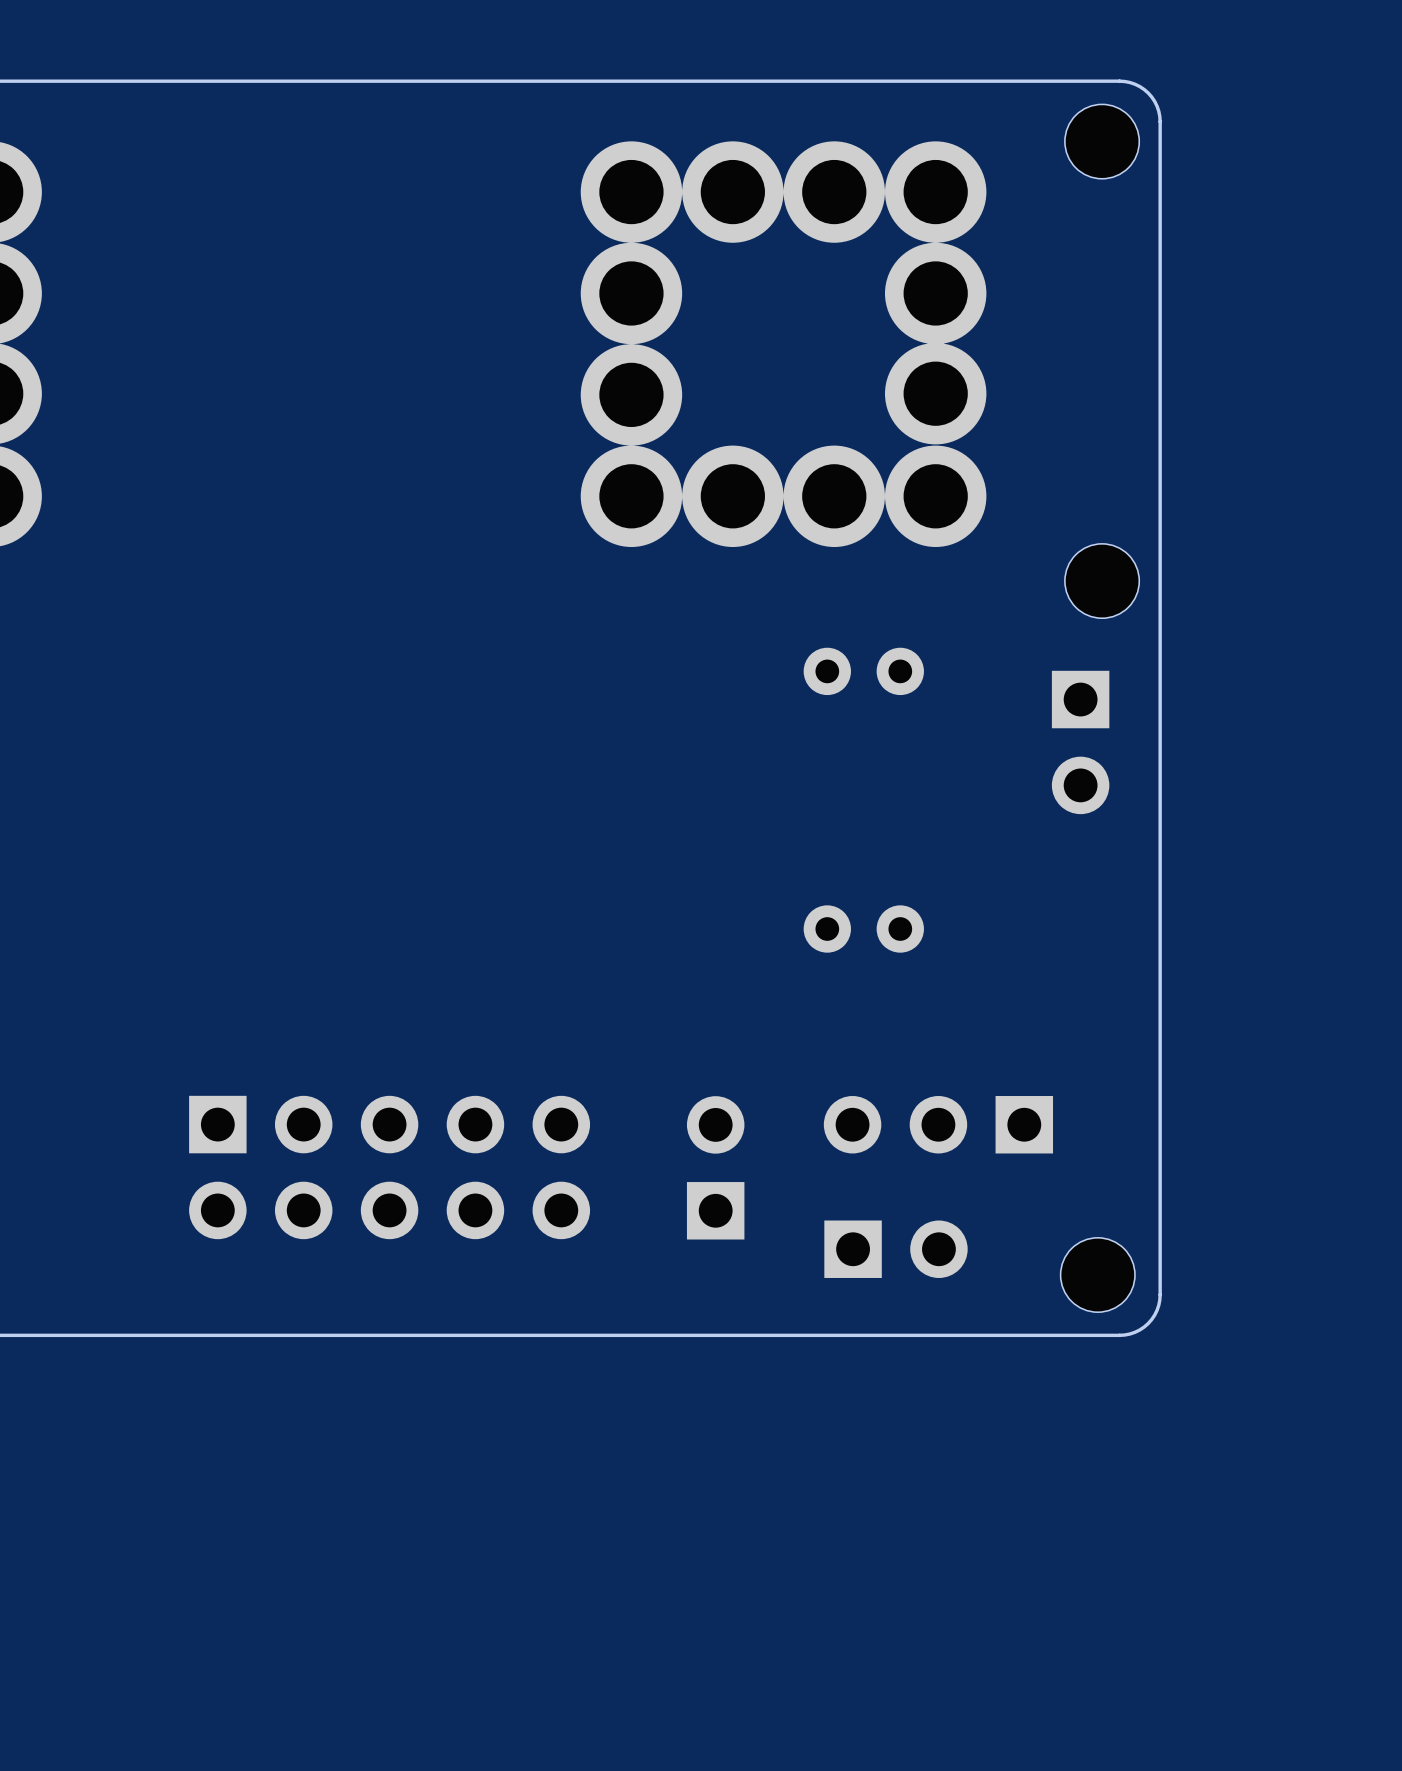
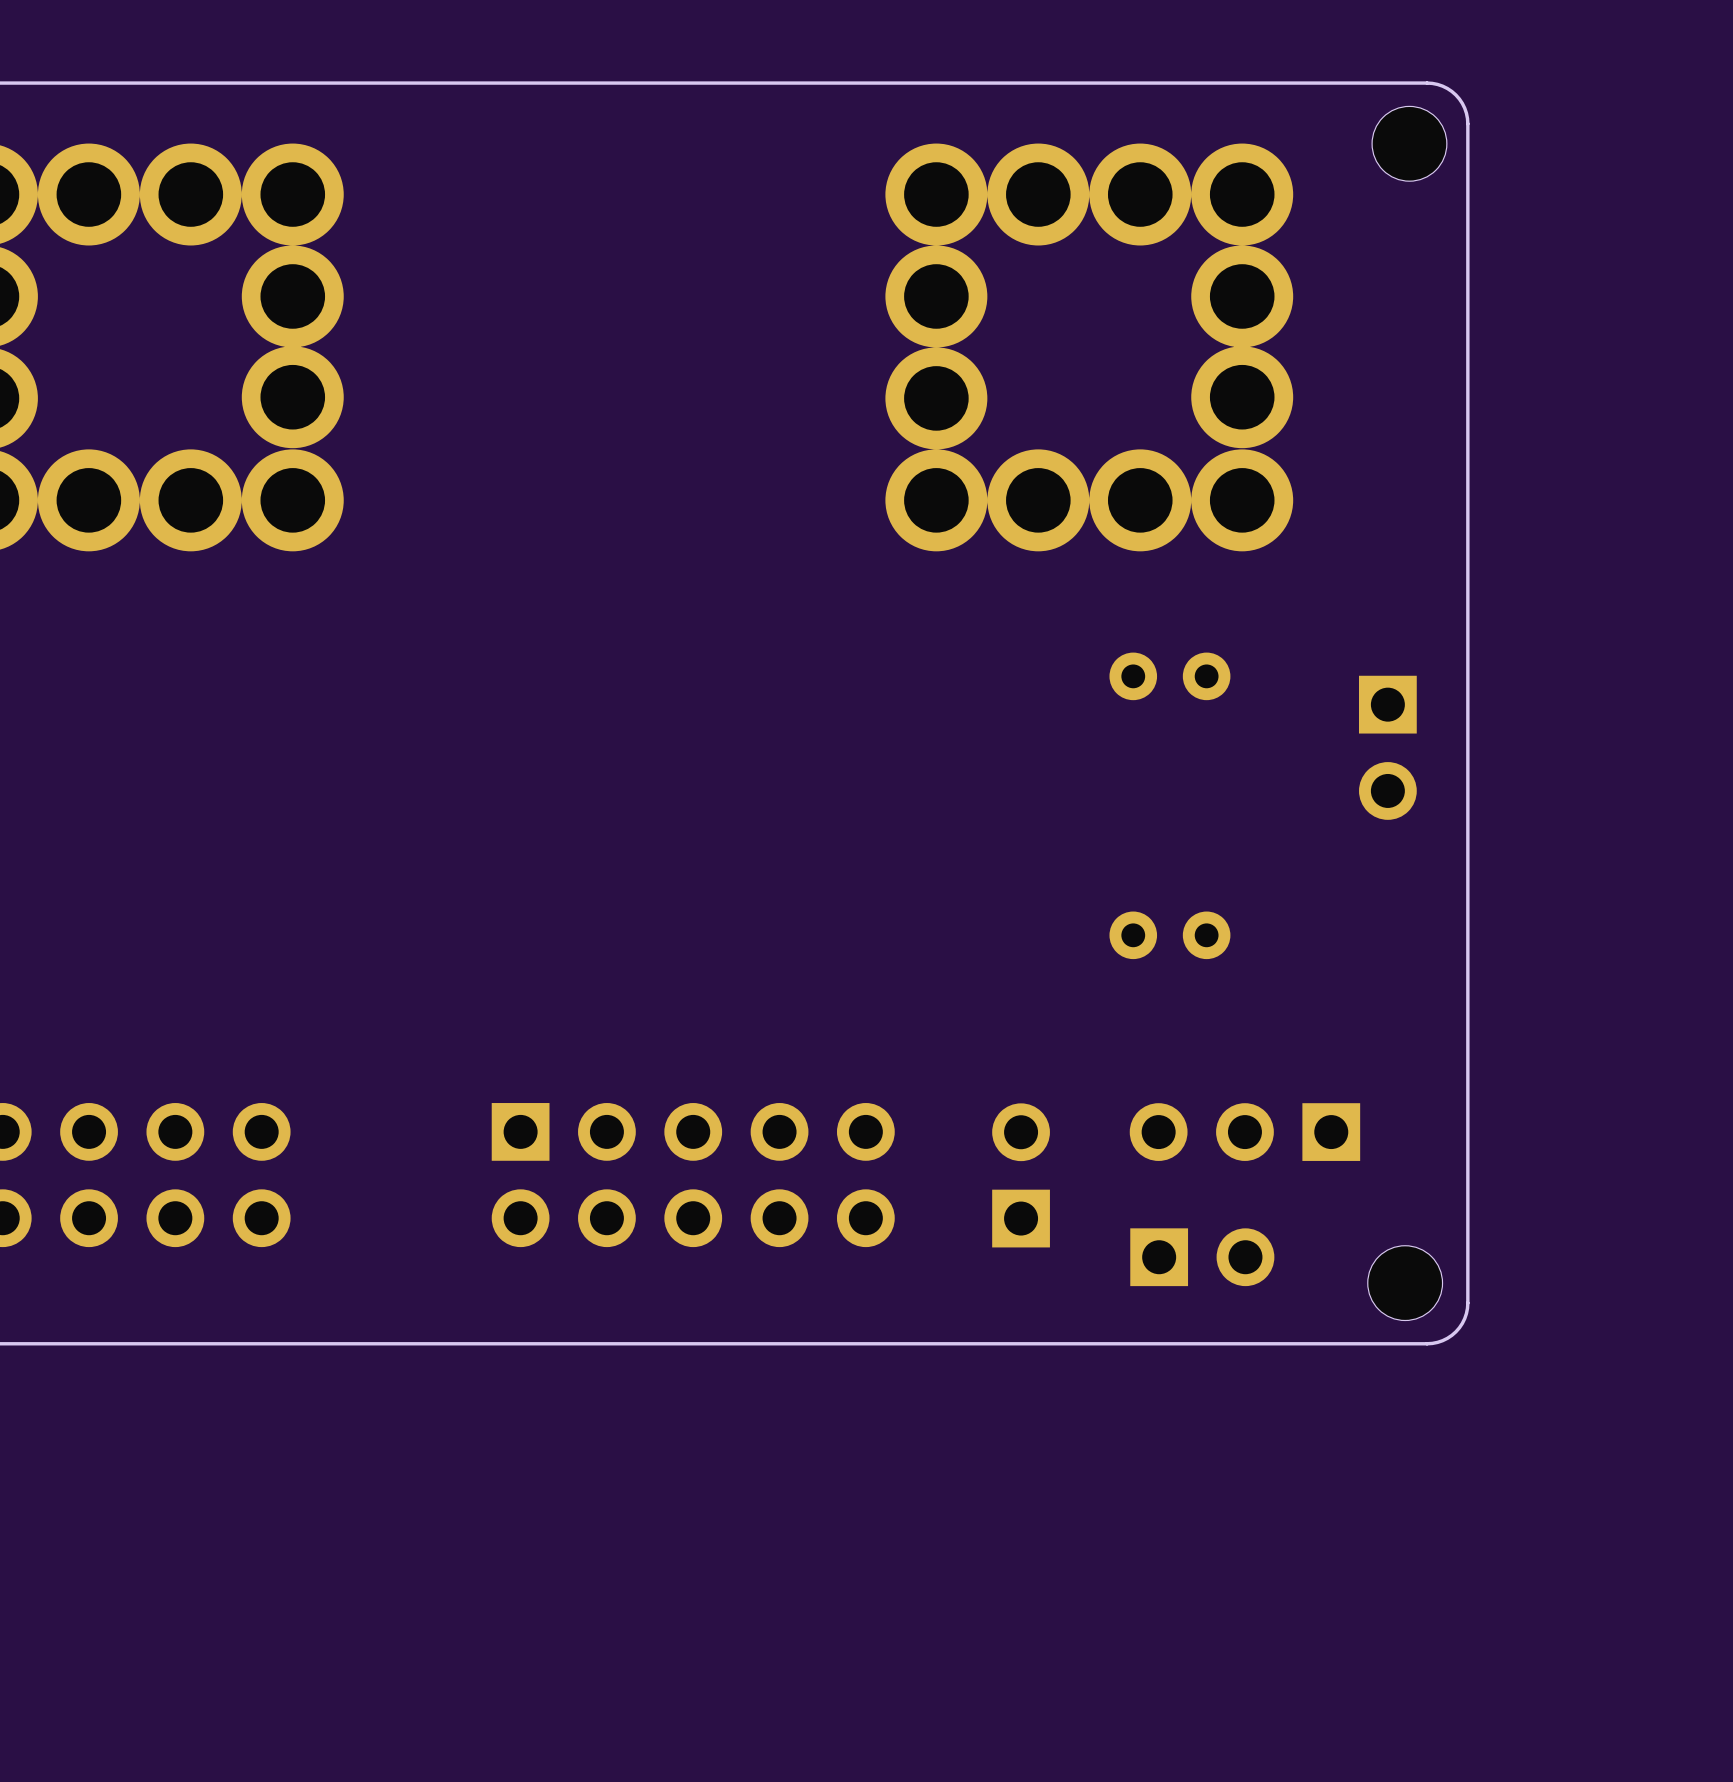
part: (1102, 581) -> none

